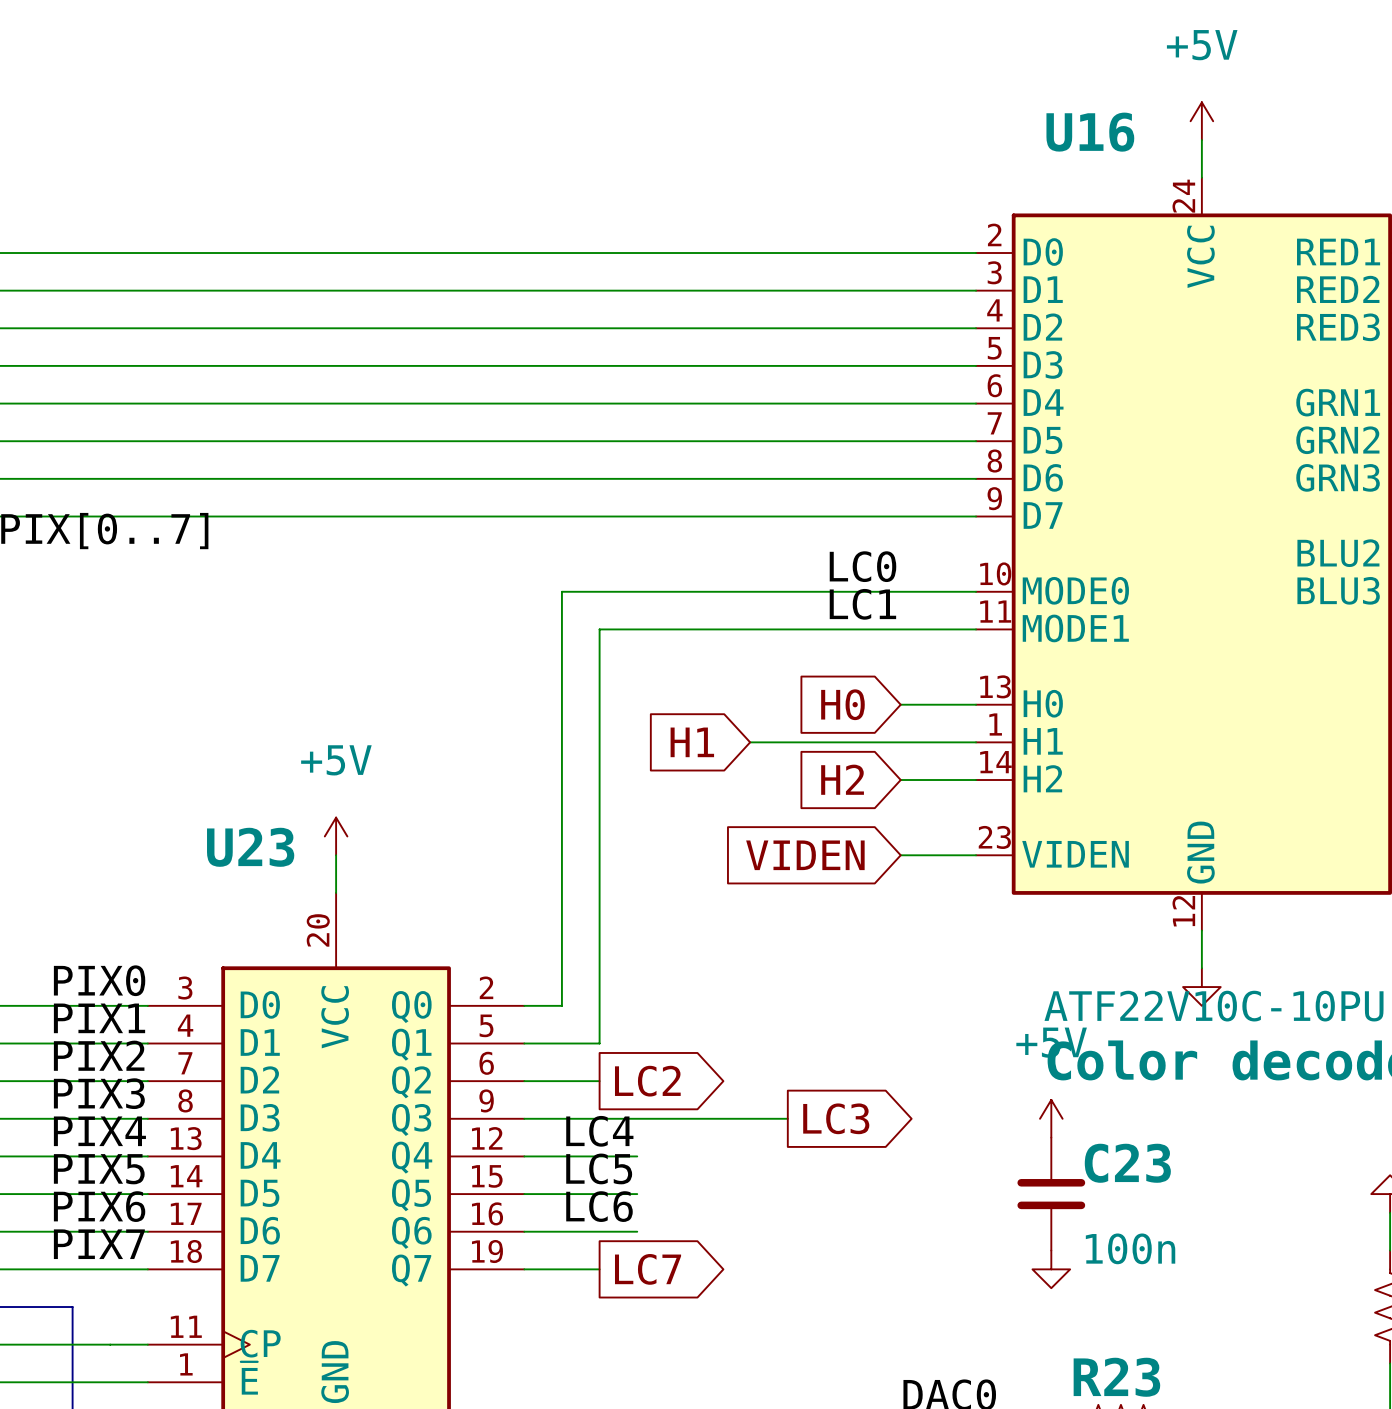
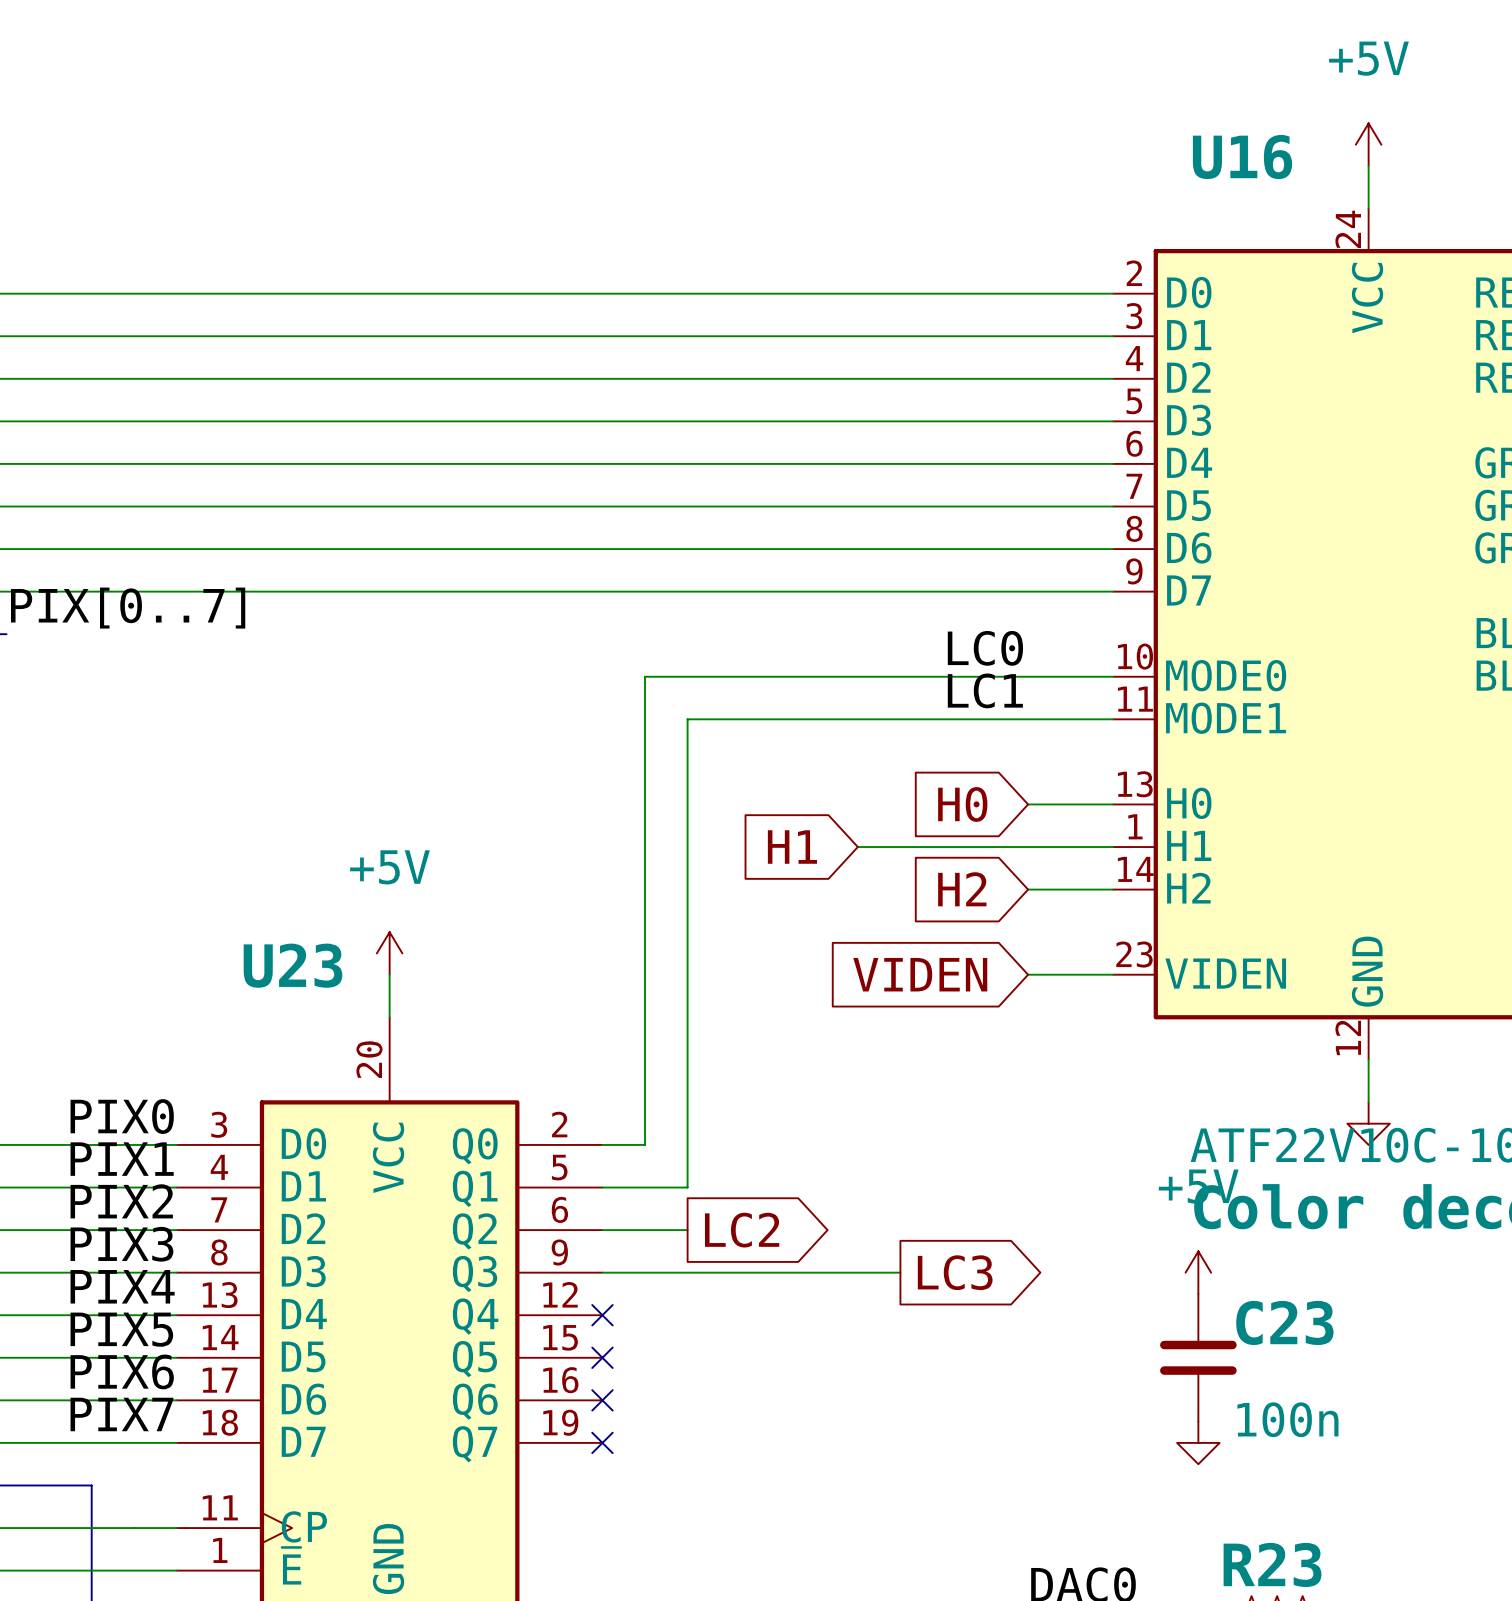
label: LC4 (599, 1131) -> none
wire: (524, 1156) (637, 1156) -> none
no-connect mark: none -> (602, 1315)
label: LC5 (599, 1168) -> none
wire: (524, 1194) (637, 1194) -> none
no-connect mark: none -> (602, 1357)
label: LC6 (599, 1206) -> none
wire: (524, 1231) (637, 1231) -> none
no-connect mark: none -> (602, 1400)
wire: (524, 1269) (599, 1269) -> none
no-connect mark: none -> (602, 1442)
global label: LC7 (648, 1269) -> none

